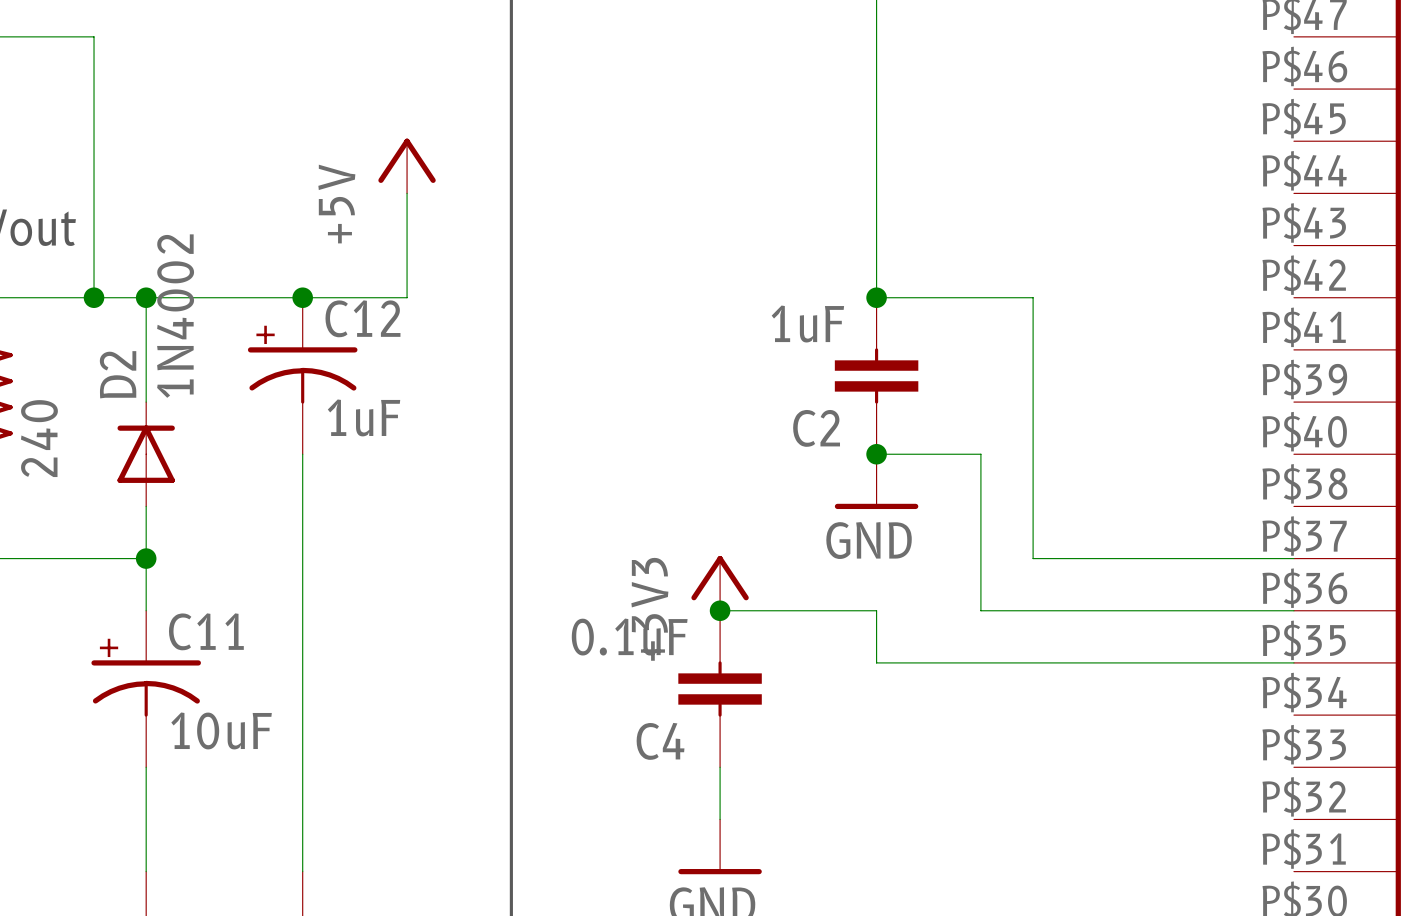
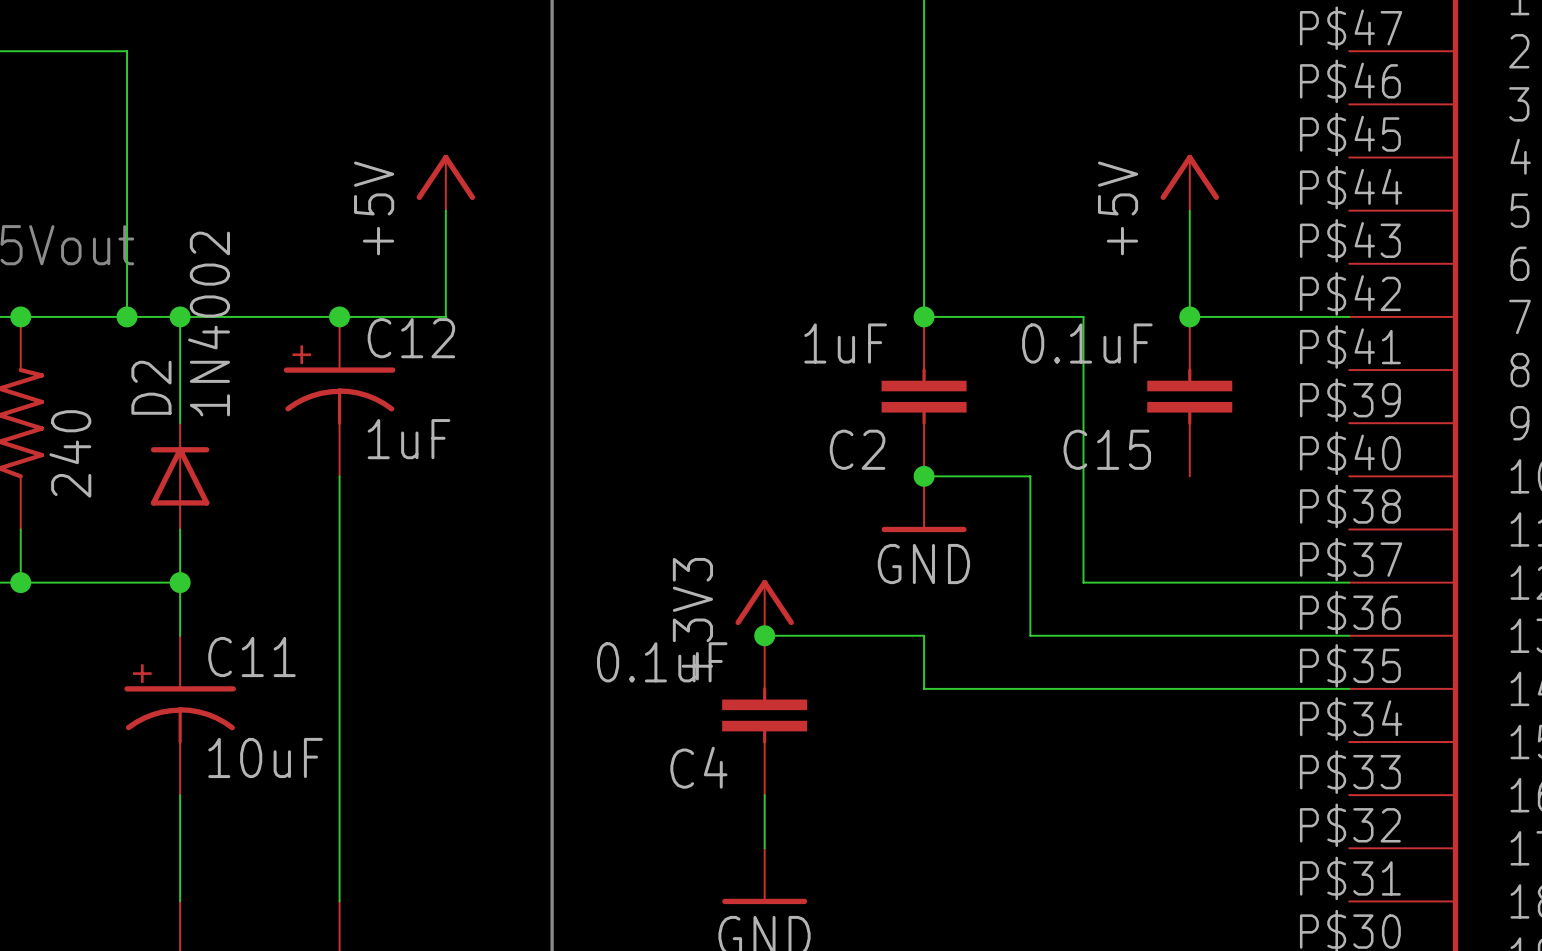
power symbol: none -> +5V (1189, 182)
wire: none -> (1189, 210) (1189, 316) (1349, 316)
junction: none -> (1189, 316)
C15: none -> 0.1uF (1189, 396)

